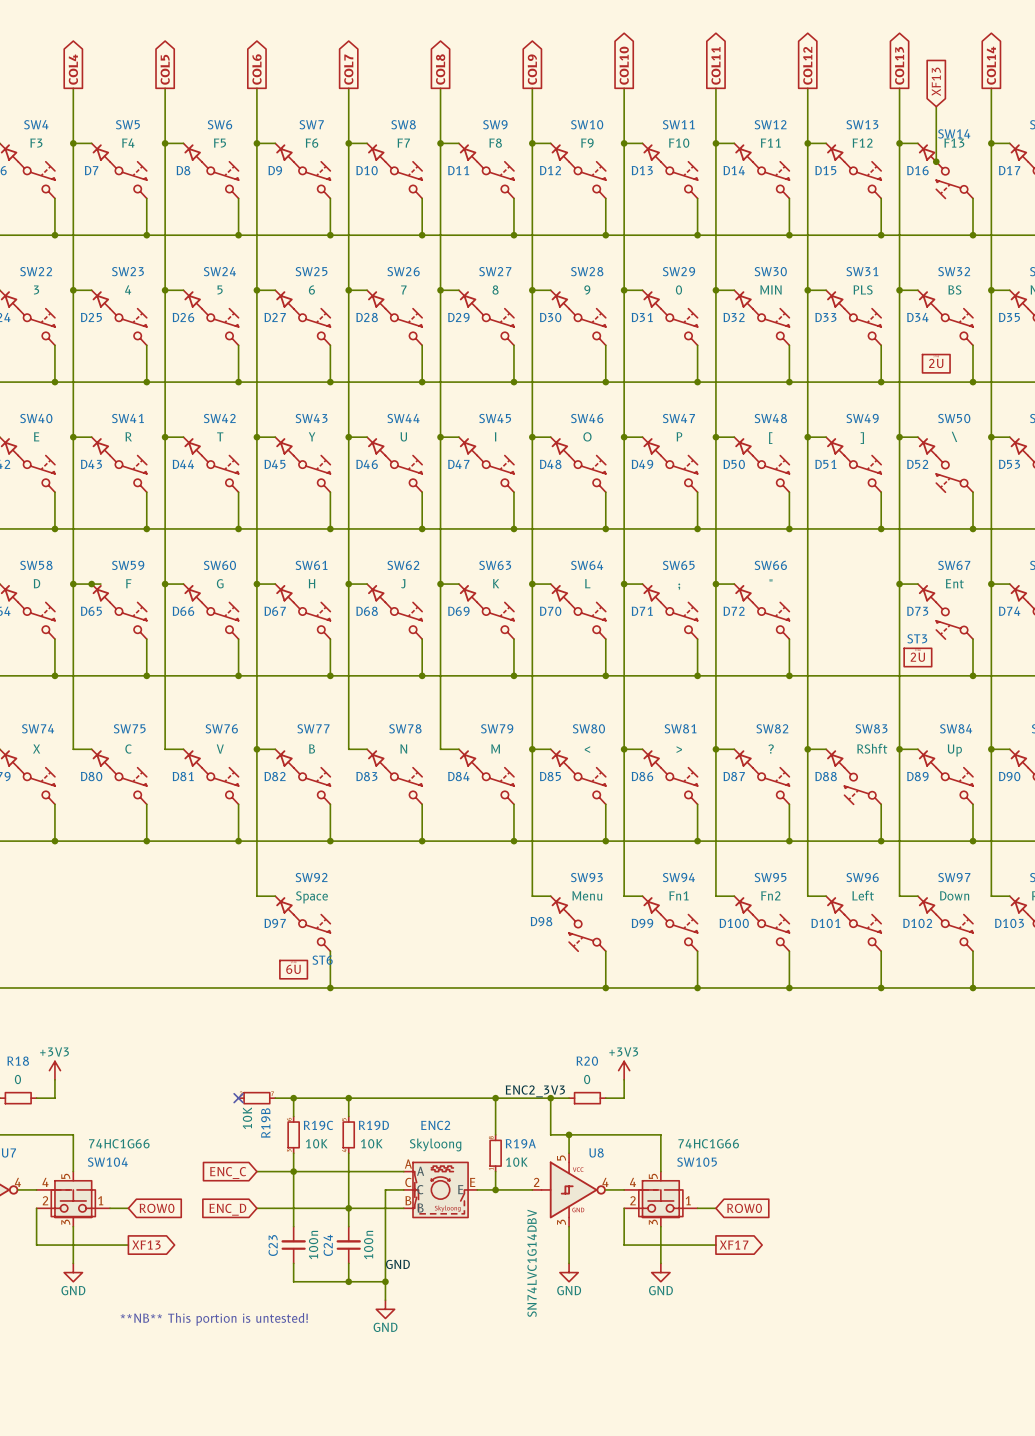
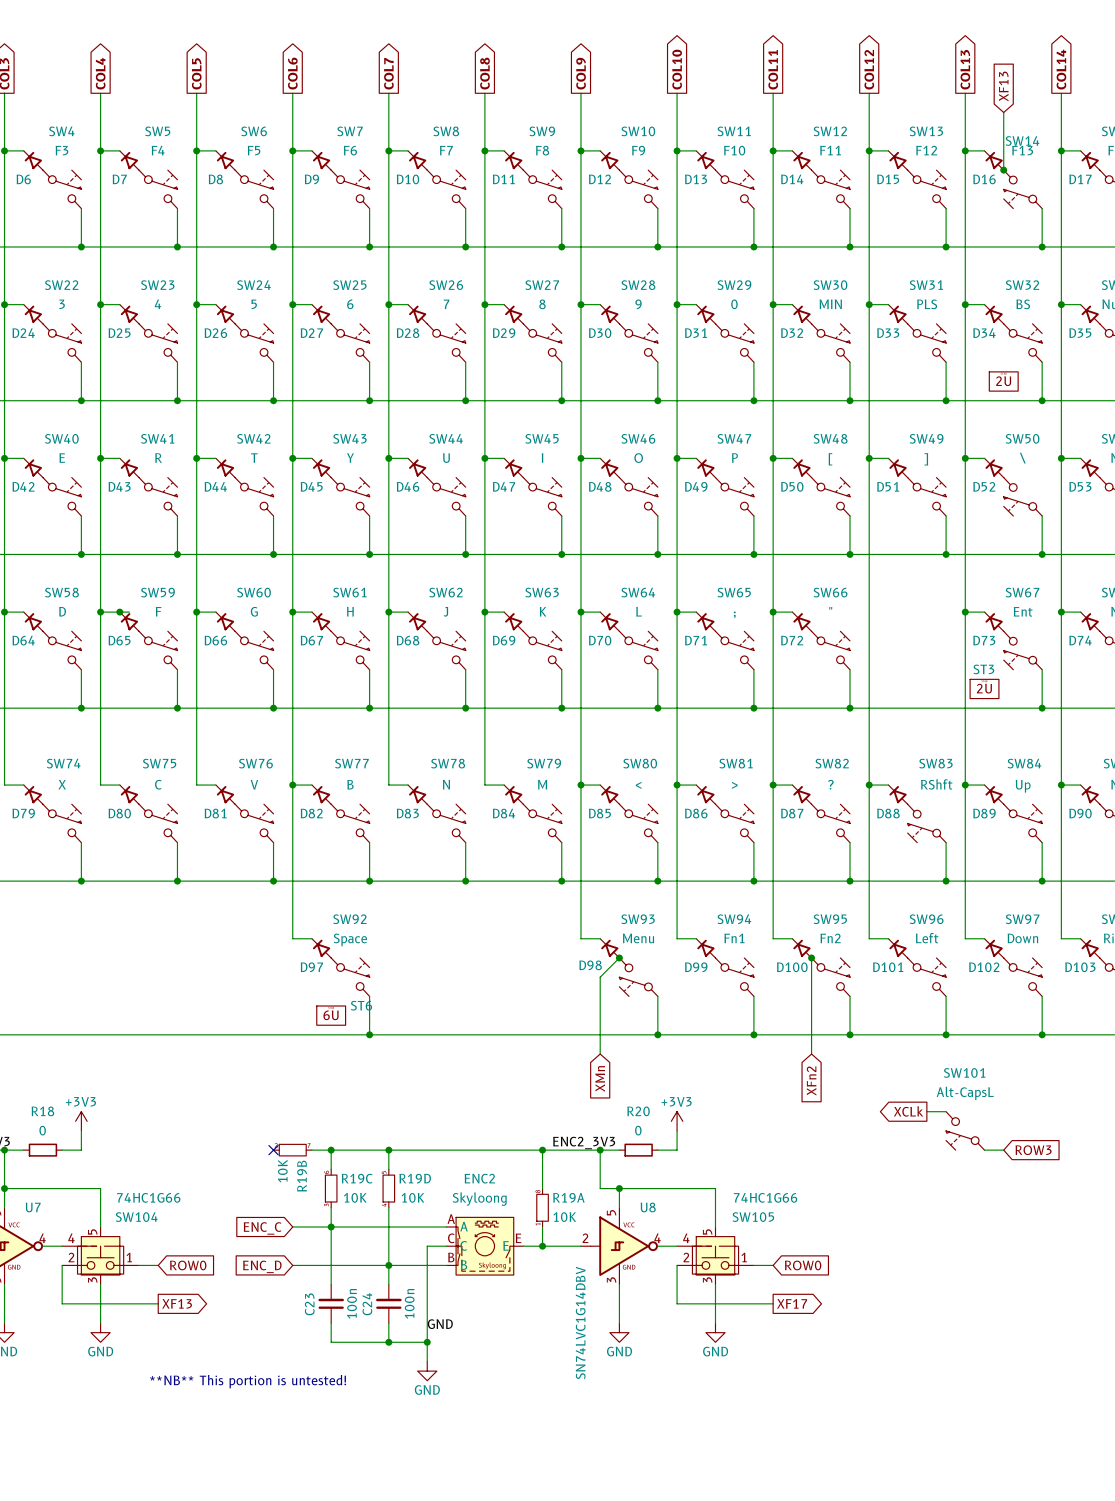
wire: none -> (619, 957) (600, 977) (600, 1054)
junction: none -> (619, 957)
wire: none -> (811, 957) (811, 1054)
junction: none -> (811, 957)
global label: none -> XMn (600, 1078)
global label: none -> XFn2 (811, 1080)
global label: none -> XCLk (908, 1111)
wire: none -> (926, 1111) (946, 1111)
SW101: none -> Alt-CapsL (965, 1130)
wire: none -> (984, 1150) (1003, 1150)
global label: none -> ROW3 (1033, 1150)

